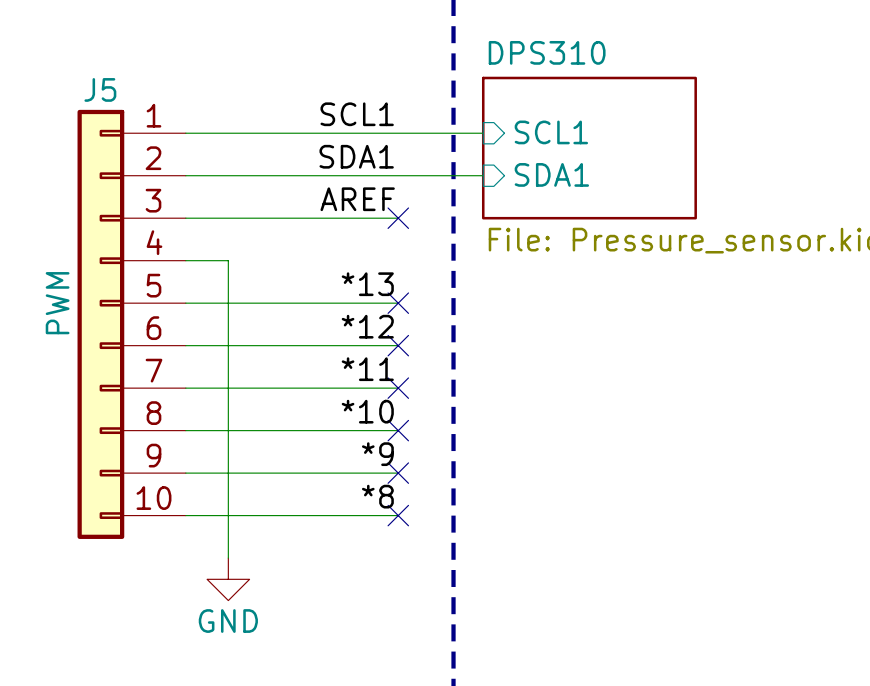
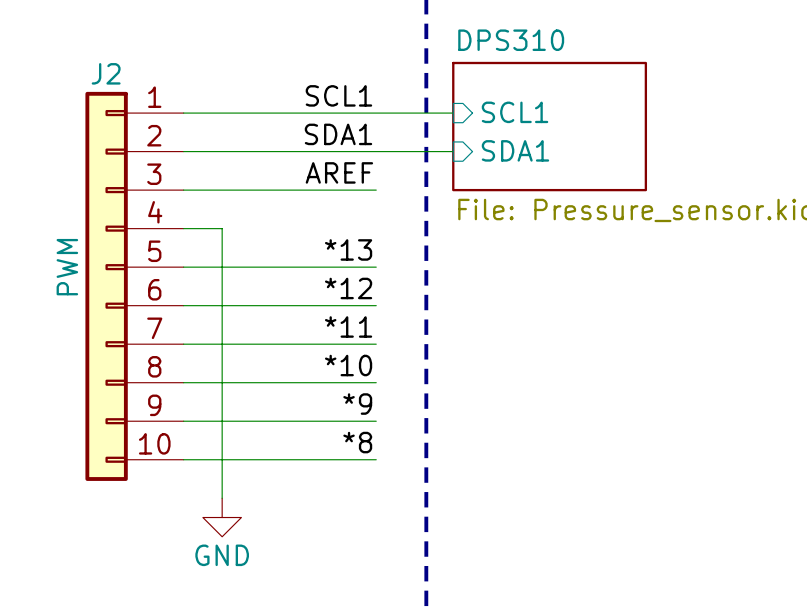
J5 name: J5 (100, 89) -> J2 (106, 73)
no-connect mark: (398, 218) -> none
no-connect mark: (398, 303) -> none
no-connect mark: (398, 345) -> none
no-connect mark: (398, 388) -> none
no-connect mark: (398, 430) -> none
no-connect mark: (398, 473) -> none
no-connect mark: (398, 515) -> none

